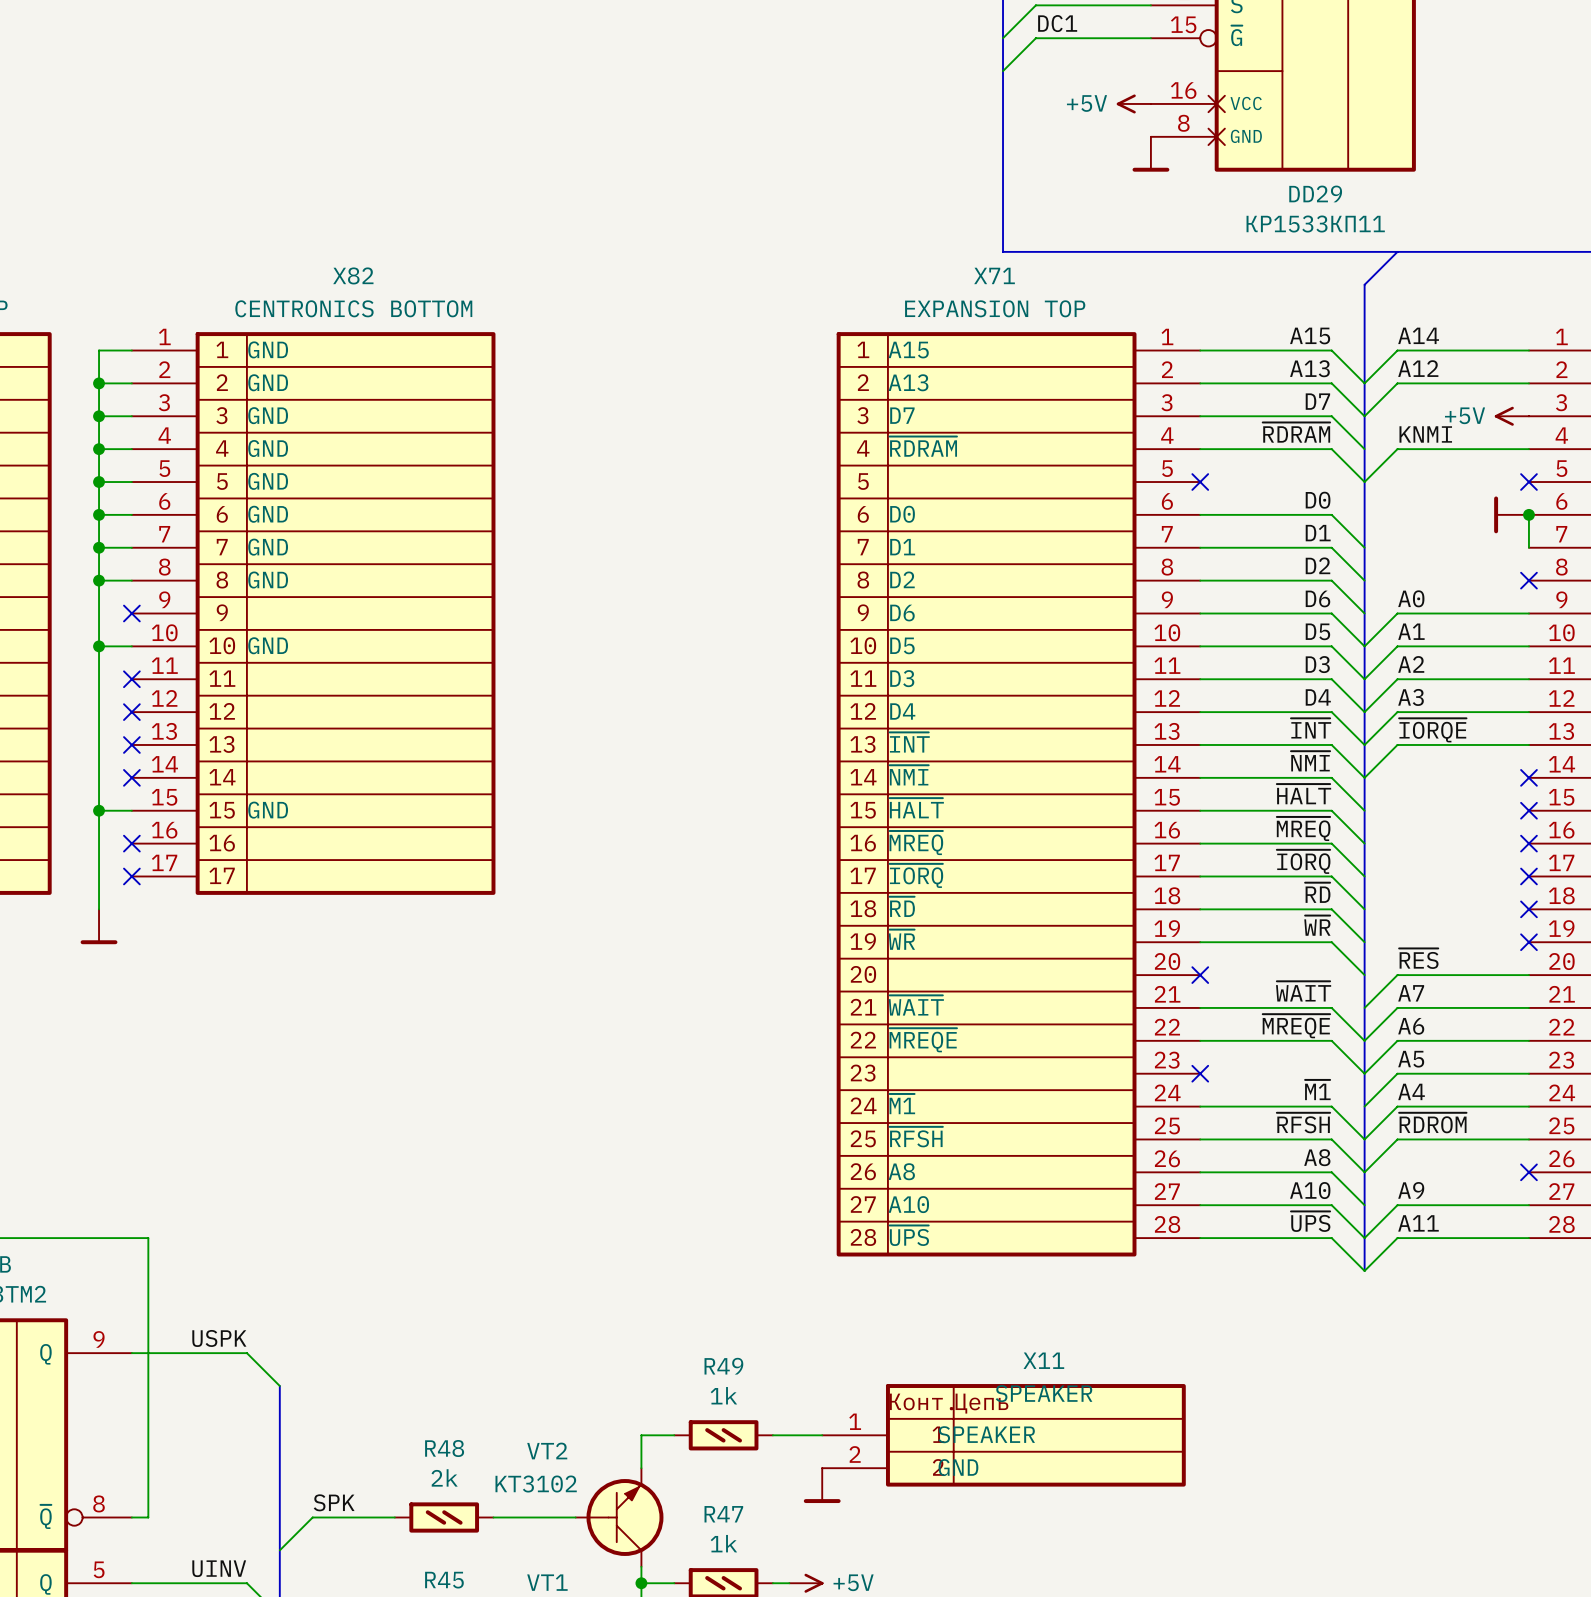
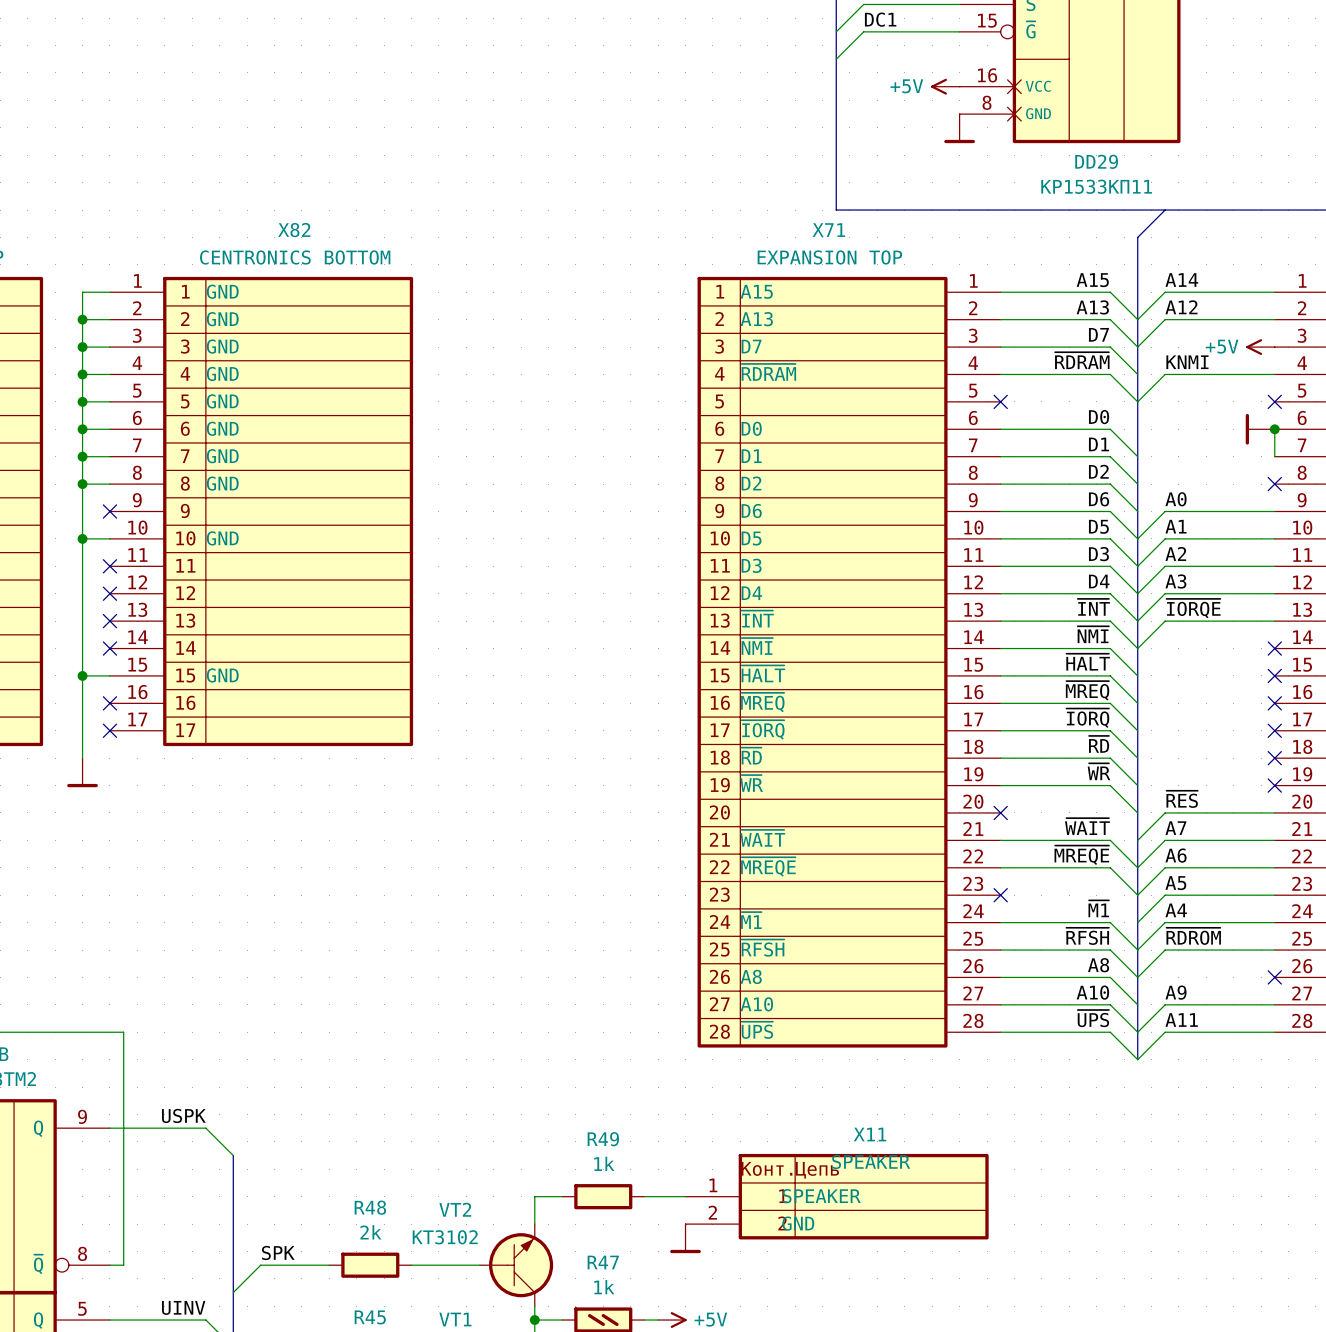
R49 symbol: [674, 1420, 773, 1451] -> [562, 1184, 645, 1210]
R48 symbol: [394, 1502, 494, 1533] -> [329, 1252, 412, 1278]

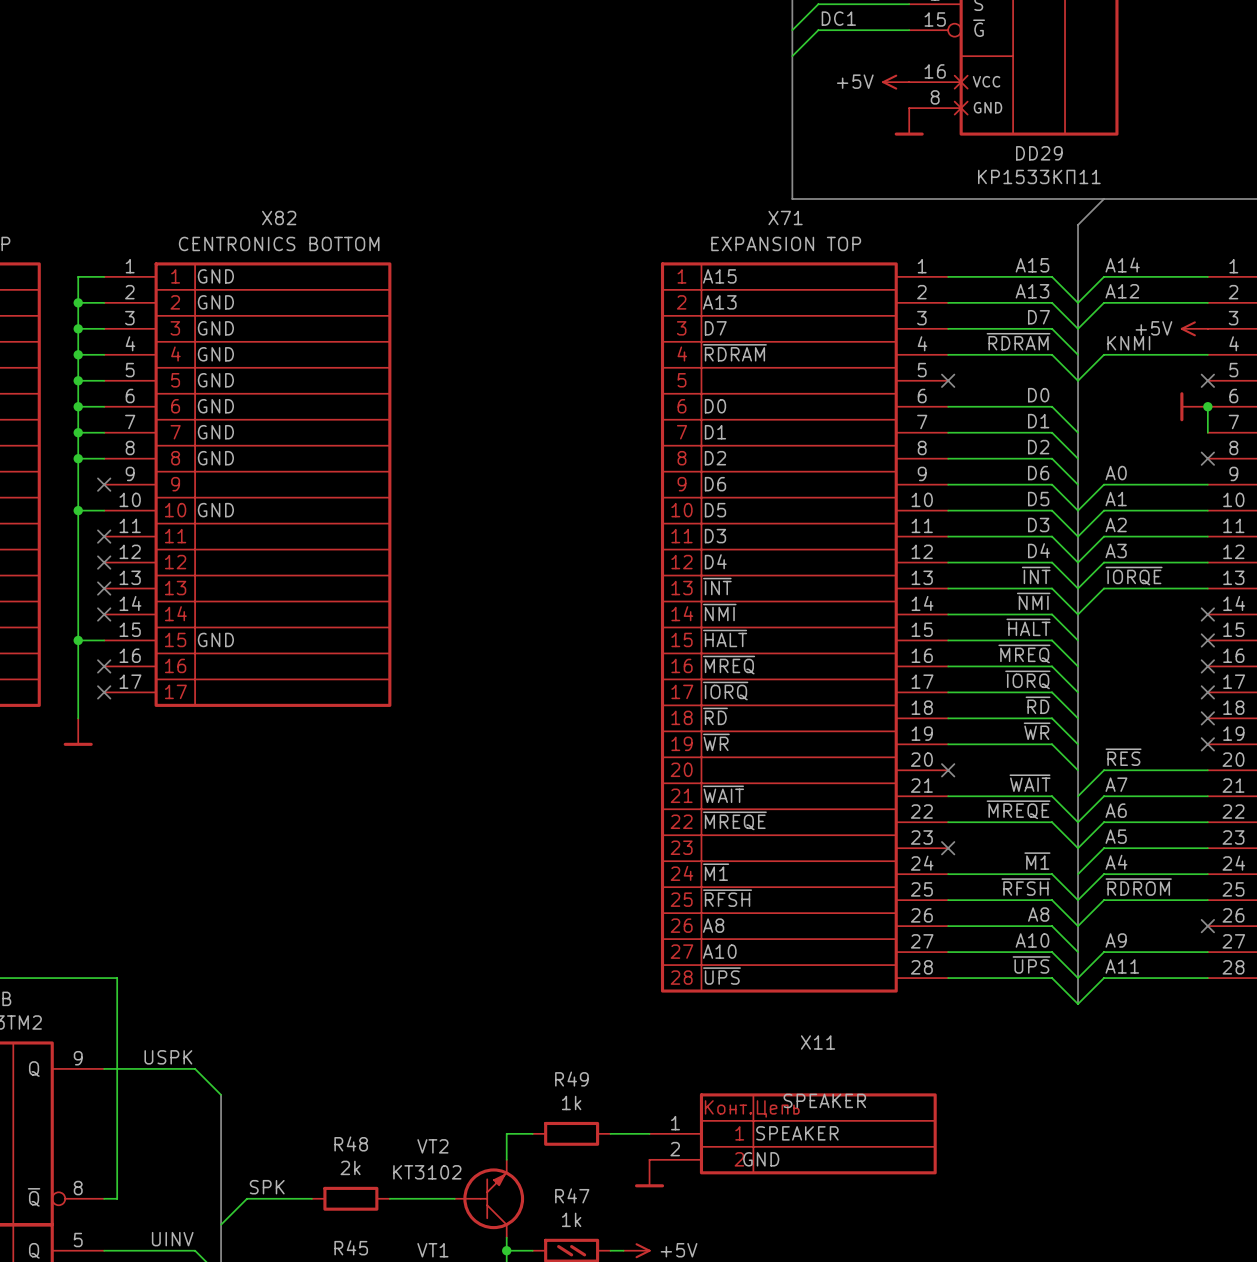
X11 name position: X11 (869, 1134) -> X11 (818, 1042)
X11 text position: SPEAKER (821, 1196) -> SPEAKER (797, 1133)

